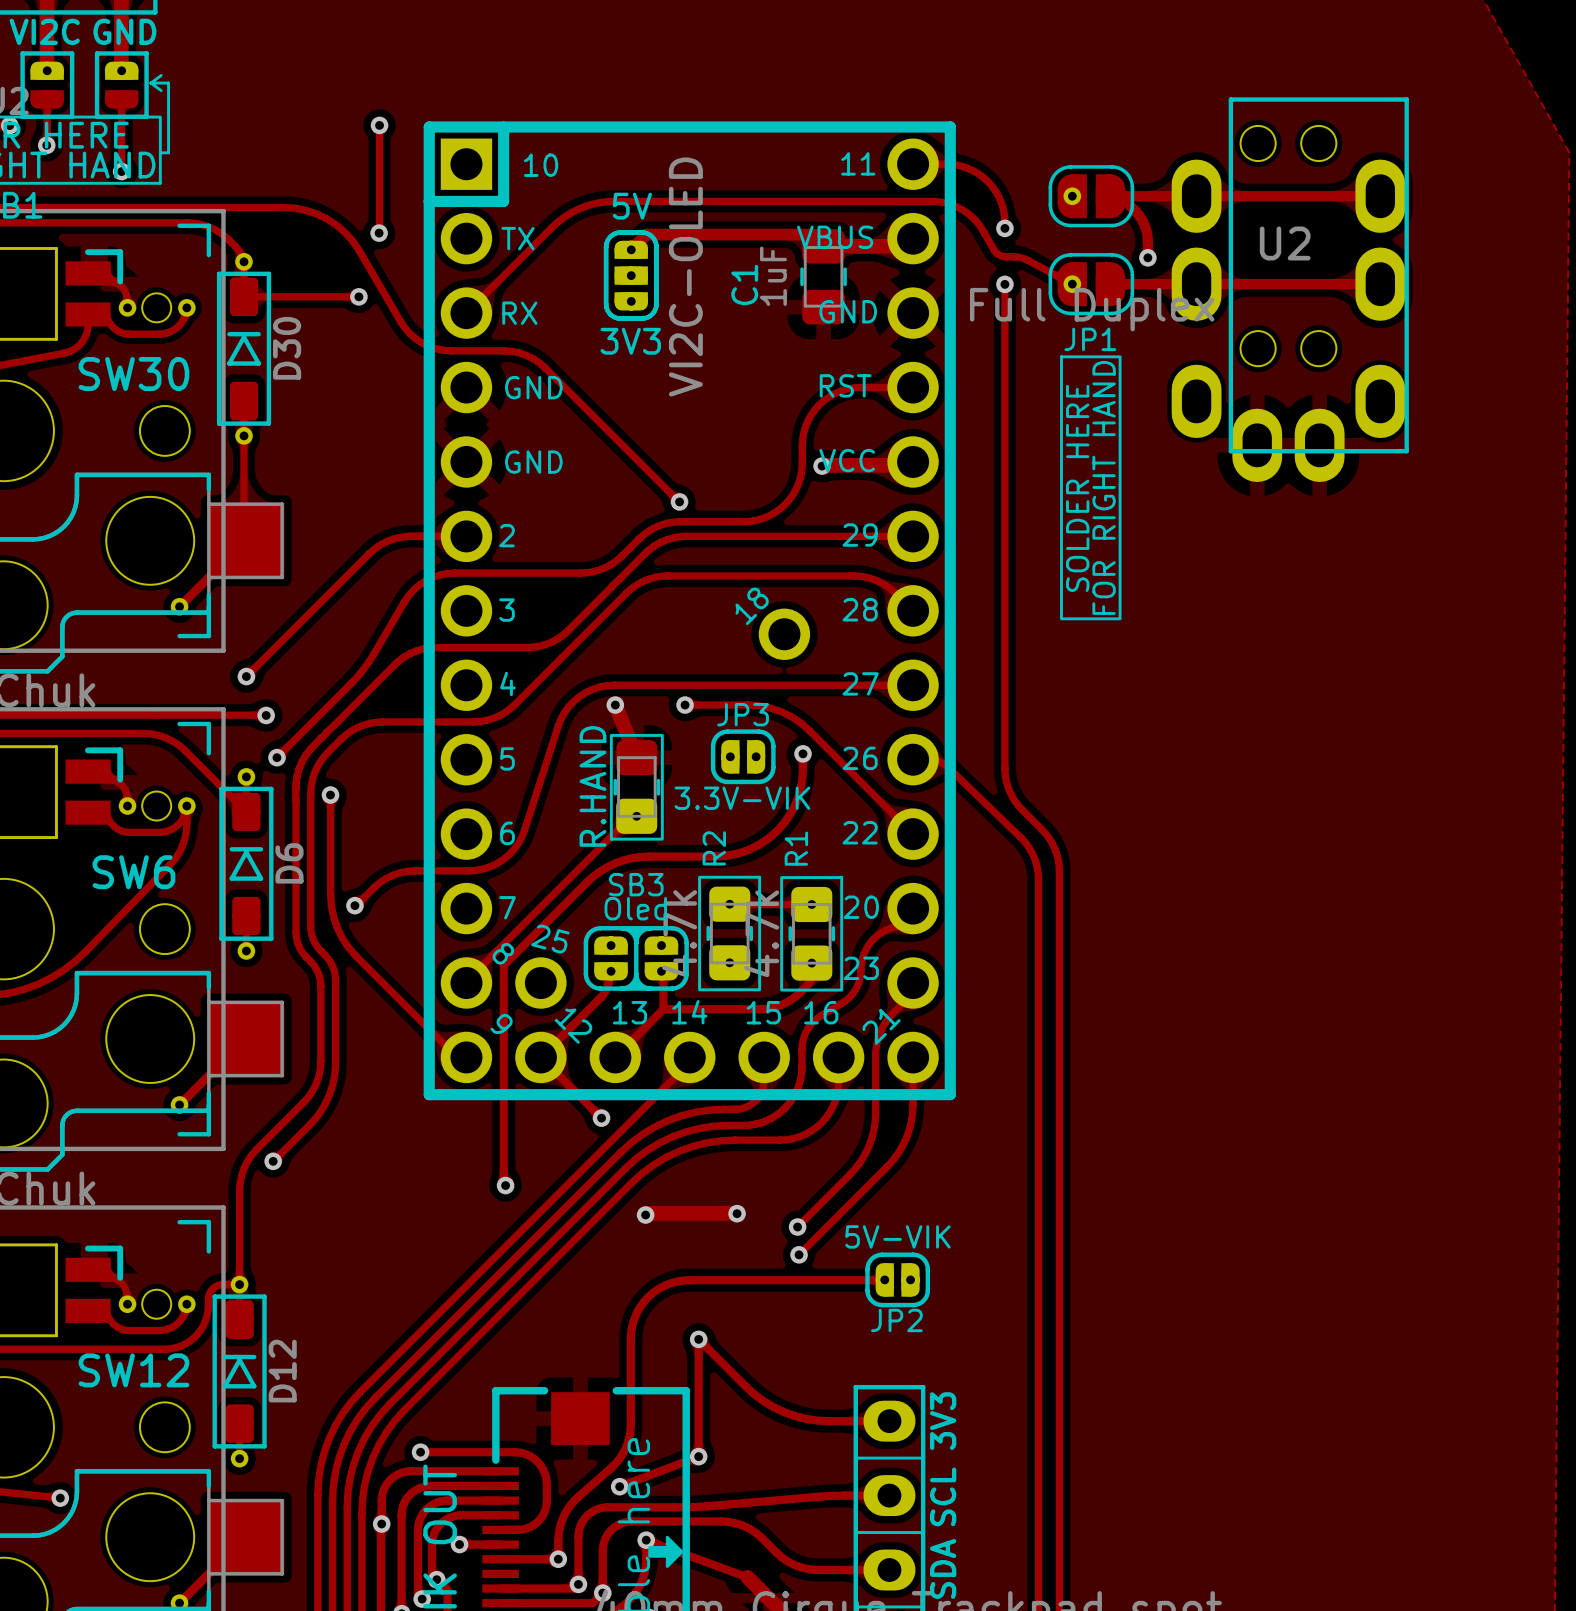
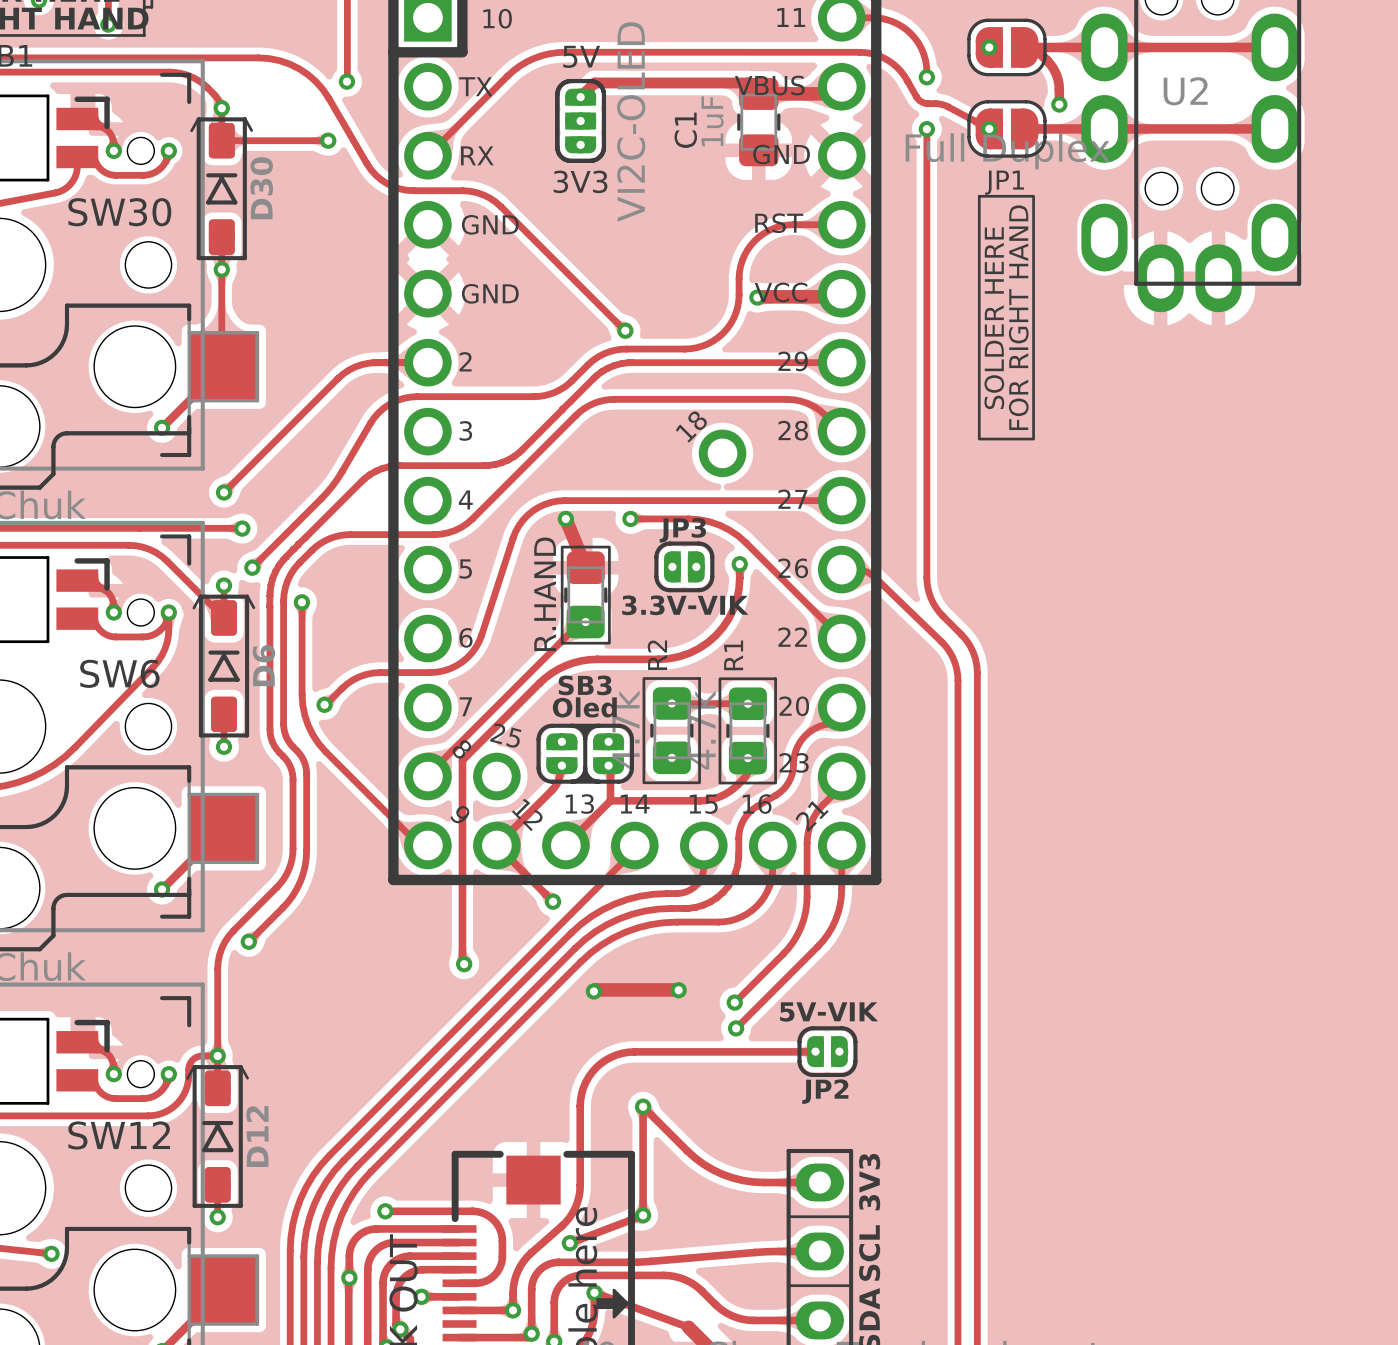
D30 footprint: [216, 253, 272, 445] -> [190, 100, 254, 278]
D6 footprint: [219, 768, 274, 960] -> [192, 577, 256, 755]
D12 footprint: [212, 1275, 267, 1468] -> [186, 1047, 249, 1226]

